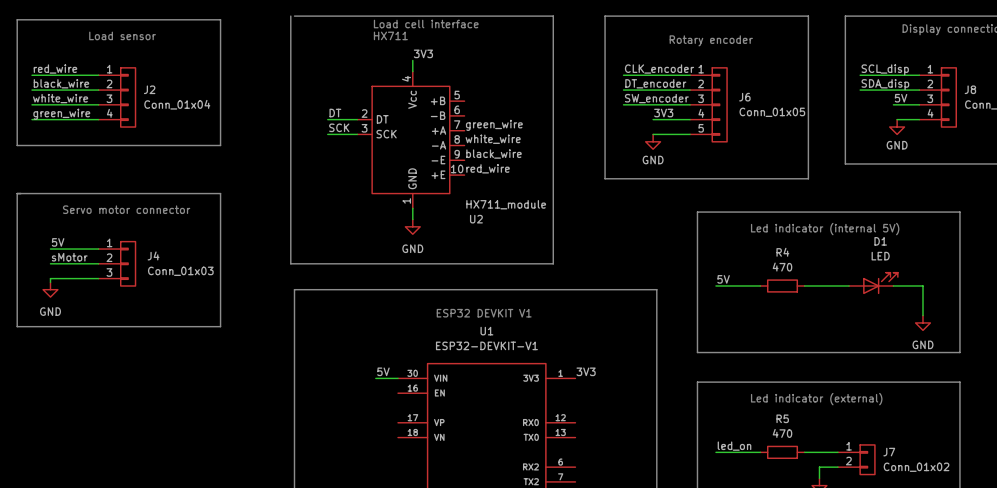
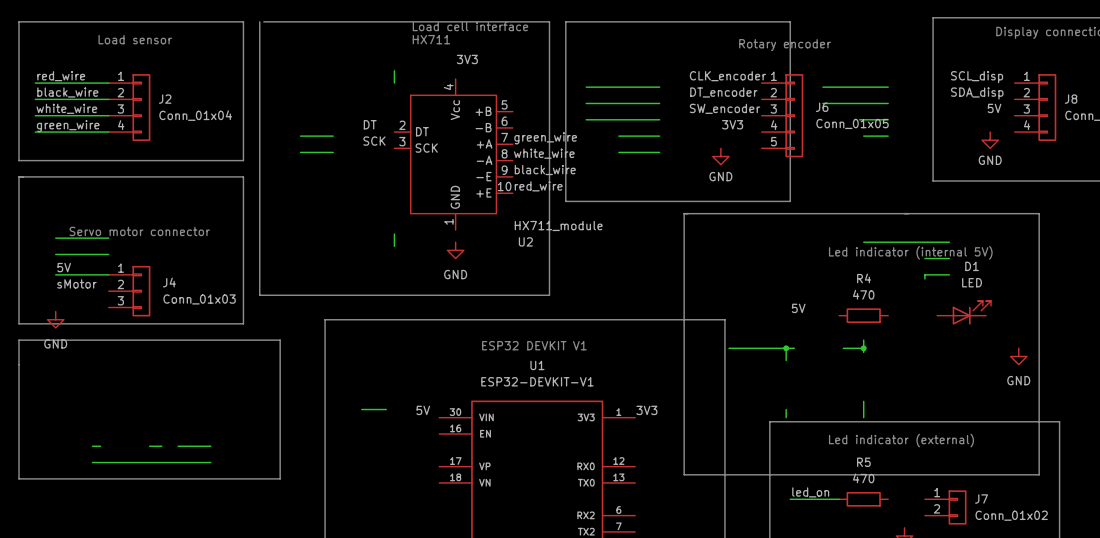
line: (290, 16) (290, 263) (553, 263) (553, 16) (294, 16) -> (259, 21) (259, 295) (549, 295) (549, 21) (263, 21)
line: (605, 16) (808, 16) (808, 178) (605, 178) (605, 16) -> (565, 21) (790, 21) (790, 201) (565, 201) (565, 21)
wire: (412, 60) (412, 71) -> (394, 70) (394, 83)
wire: (623, 75) (690, 75) -> (586, 87) (659, 87)
wire: (860, 75) (919, 75) -> (822, 87) (888, 87)
wire: (623, 90) (690, 90) -> (586, 103) (659, 103)
wire: (860, 90) (919, 90) -> (822, 103) (888, 103)
wire: (623, 104) (690, 104) -> (586, 119) (659, 119)
wire: (893, 104) (919, 104) -> (859, 119) (888, 119)
wire: (327, 119) (357, 119) -> (300, 136) (333, 136)
wire: (653, 119) (690, 119) -> (618, 136) (659, 136)
wire: (897, 119) (919, 119) -> (863, 136) (888, 136)
wire: (327, 134) (357, 134) -> (300, 152) (333, 152)
wire: (653, 134) (690, 134) -> (618, 152) (659, 152)
line: (17, 193) (220, 193) -> (19, 213) (19, 176) (243, 176) (243, 213)
line: none -> (684, 213) (1039, 213) (1039, 474) (684, 474) (684, 213)
wire: (412, 208) (412, 219) -> (394, 234) (394, 246)
line: (697, 212) (697, 352) (959, 352) (959, 212) (697, 212) -> none
wire: none -> (55, 238) (108, 238)
wire: none -> (863, 242) (949, 242)
wire: none -> (924, 258) (949, 258)
wire: none -> (949, 274) (924, 274) (924, 278)
wire: (50, 263) (98, 263) -> (55, 254) (108, 254)
wire: (98, 278) (50, 278) (50, 282) -> none
wire: (715, 285) (760, 285) -> none
wire: (804, 285) (849, 285) -> none
wire: (893, 285) (922, 285) (922, 315) -> none
line: (17, 293) (17, 308) -> (19, 360) (19, 478) (280, 478) (280, 340) (19, 340)
line: (220, 293) (220, 326) (17, 326) -> (243, 323) (19, 323)
wire: none -> (863, 340) (863, 352)
wire: none -> (729, 348) (794, 348)
wire: none -> (786, 348) (786, 360)
junction: none -> (786, 348)
wire: none -> (843, 348) (863, 348)
junction: none -> (863, 348)
wire: none -> (863, 401) (863, 417)
wire: none -> (786, 409) (786, 417)
wire: (375, 378) (398, 378) -> (361, 409) (386, 409)
wire: none -> (92, 446) (100, 446)
wire: none -> (149, 446) (161, 446)
wire: none -> (178, 446) (210, 446)
wire: none -> (92, 462) (210, 462)
wire: (804, 452) (837, 452) -> none
wire: (837, 467) (819, 467) (819, 478) -> none

